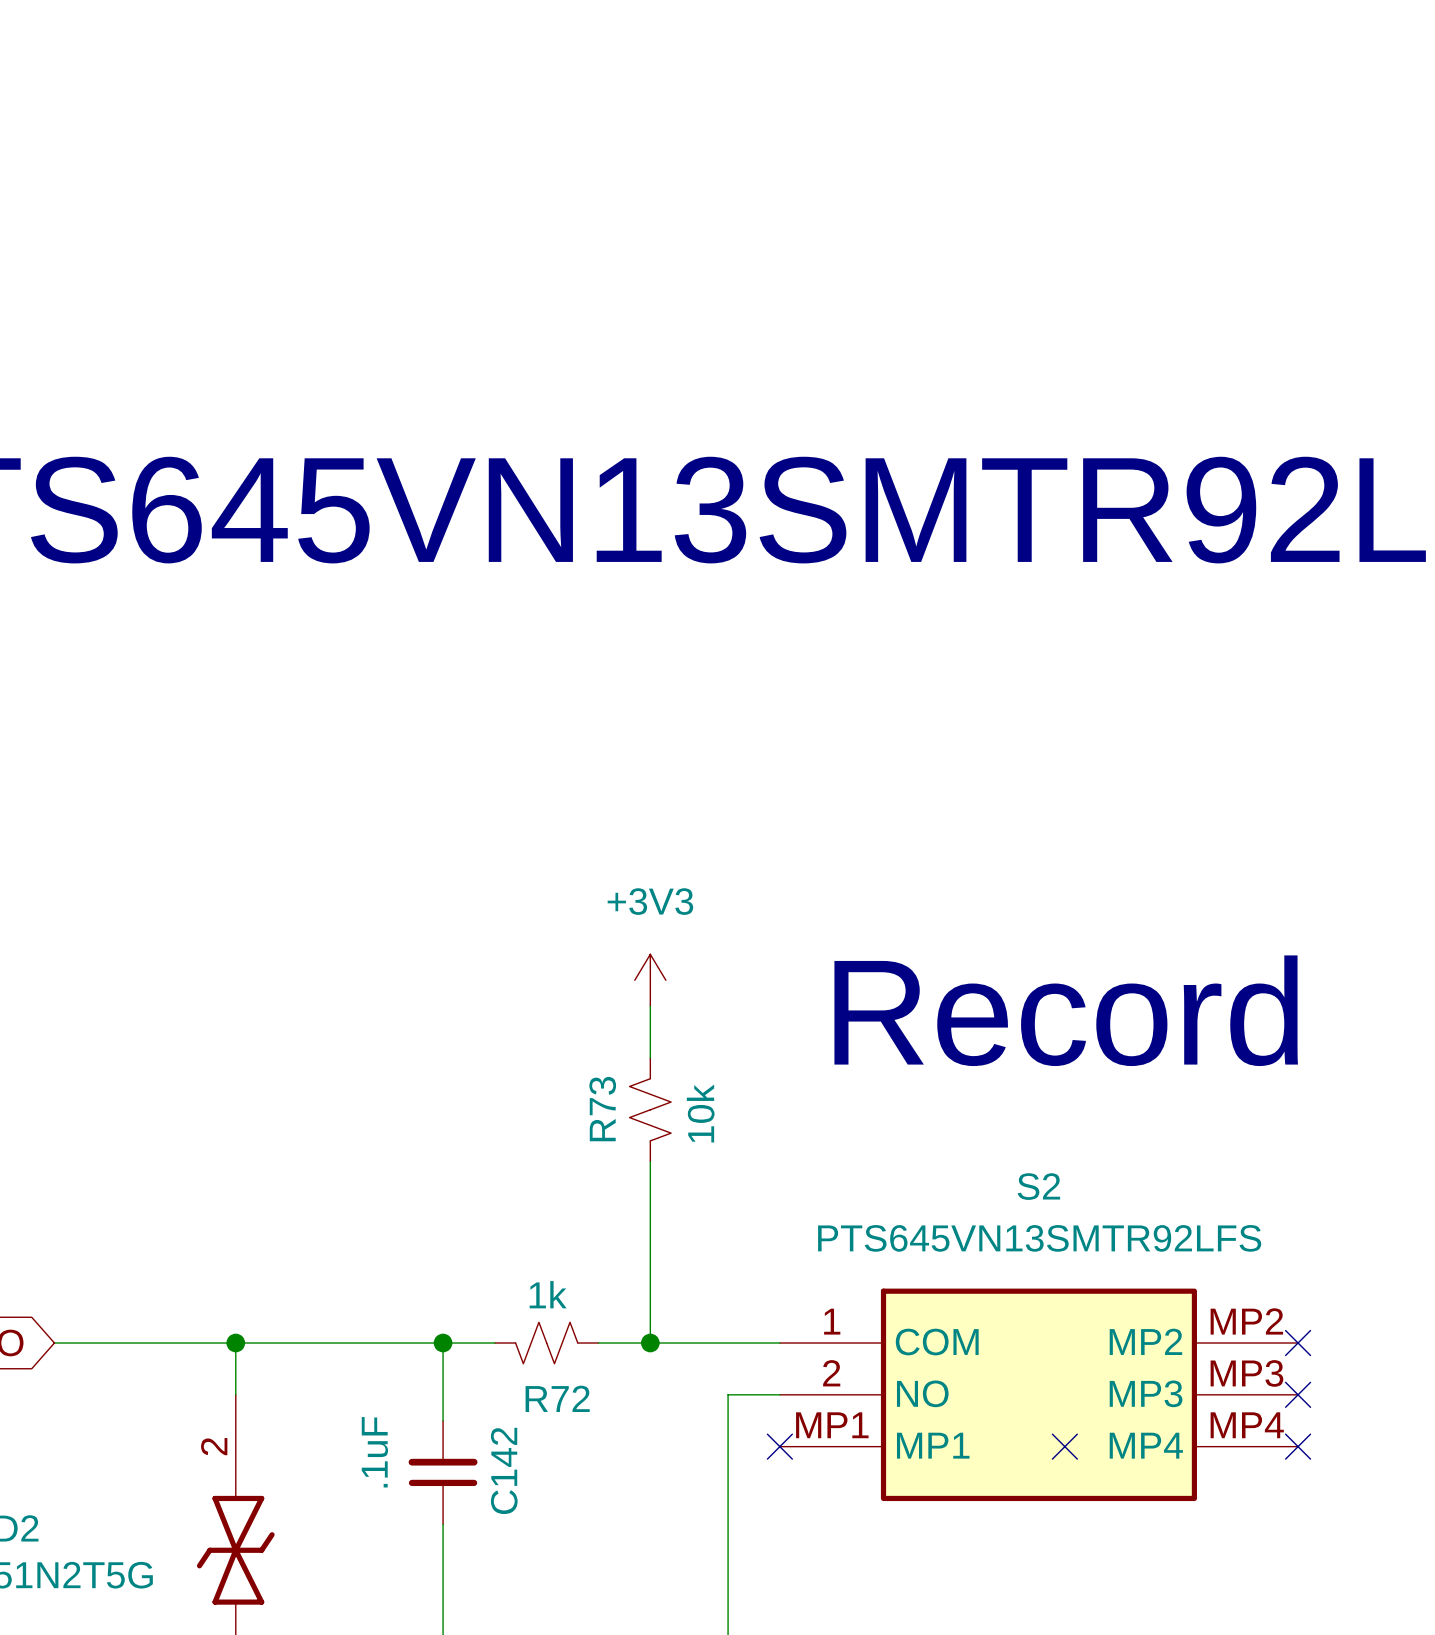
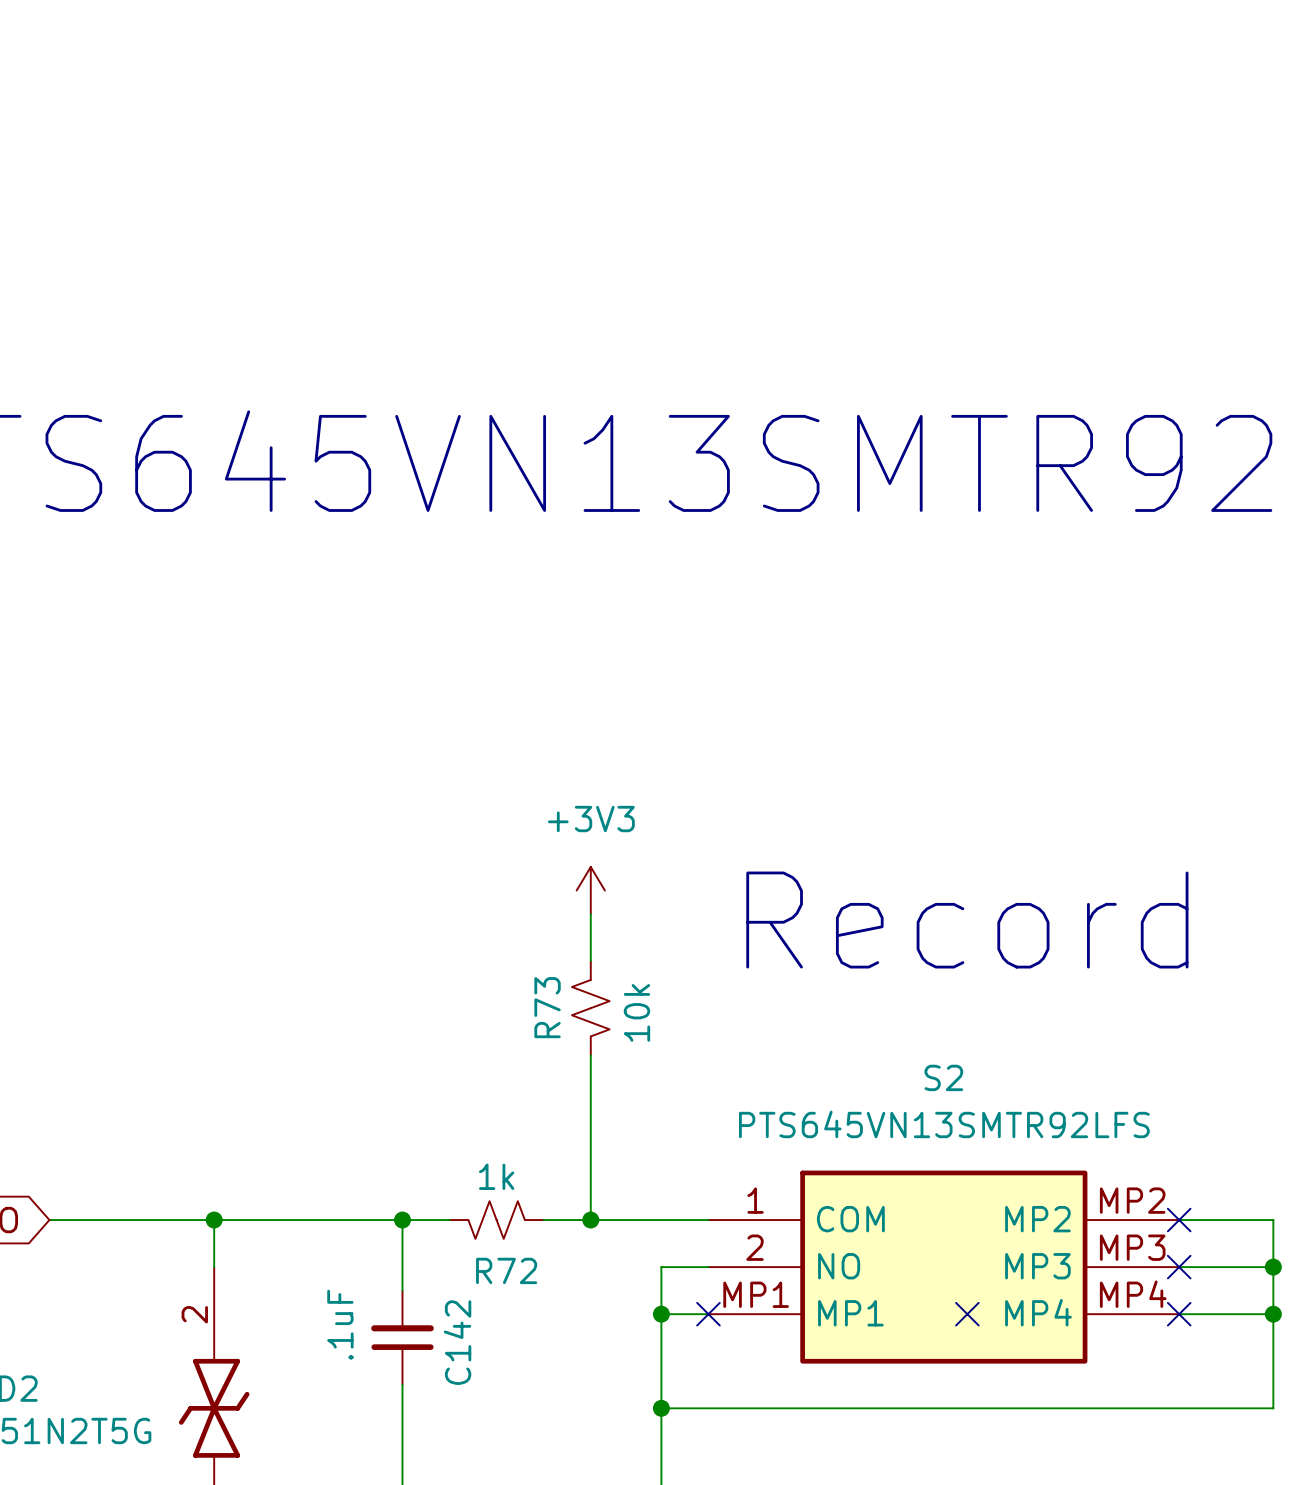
wire: none -> (1179, 1220) (1273, 1220) (1273, 1408) (661, 1408)
wire: none -> (1179, 1267) (1273, 1267)
junction: none -> (1273, 1267)
wire: none -> (661, 1314) (708, 1314)
junction: none -> (661, 1314)
wire: none -> (1179, 1314) (1273, 1314)
junction: none -> (1273, 1314)
junction: none -> (661, 1408)

